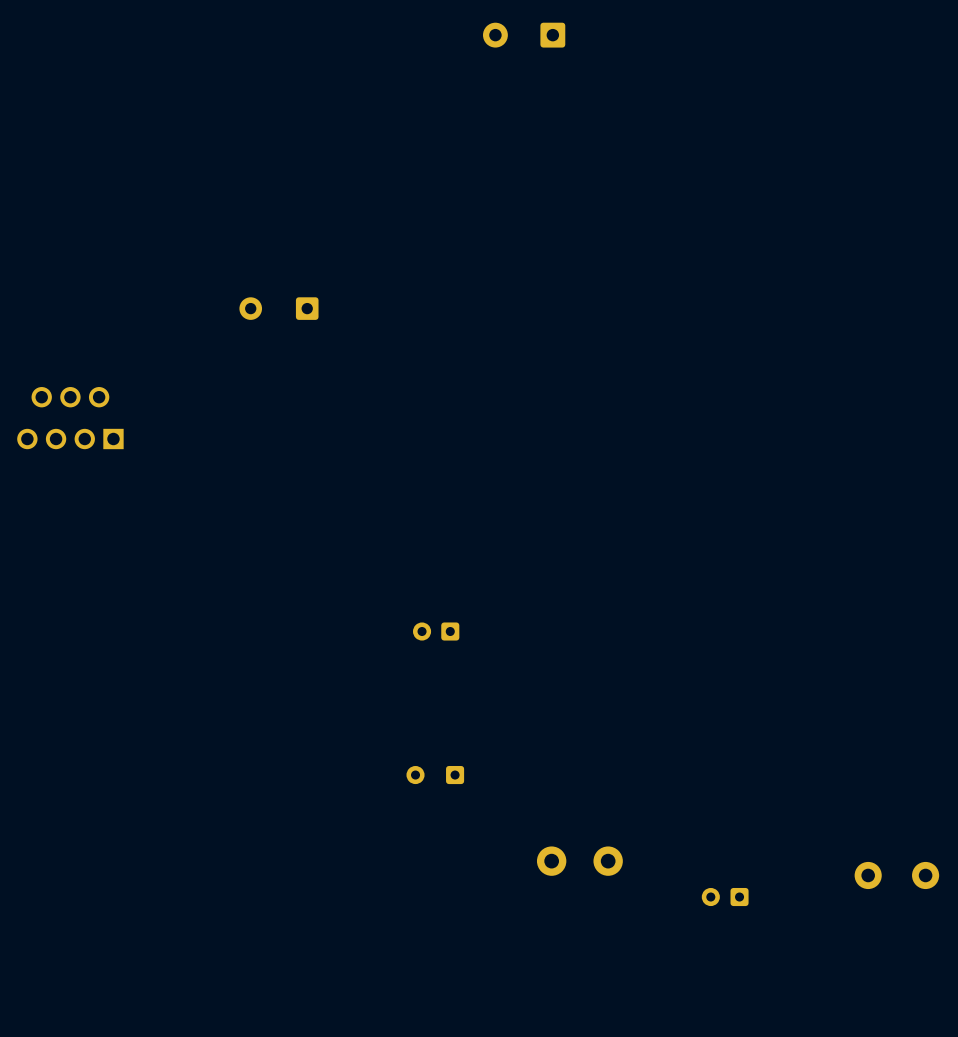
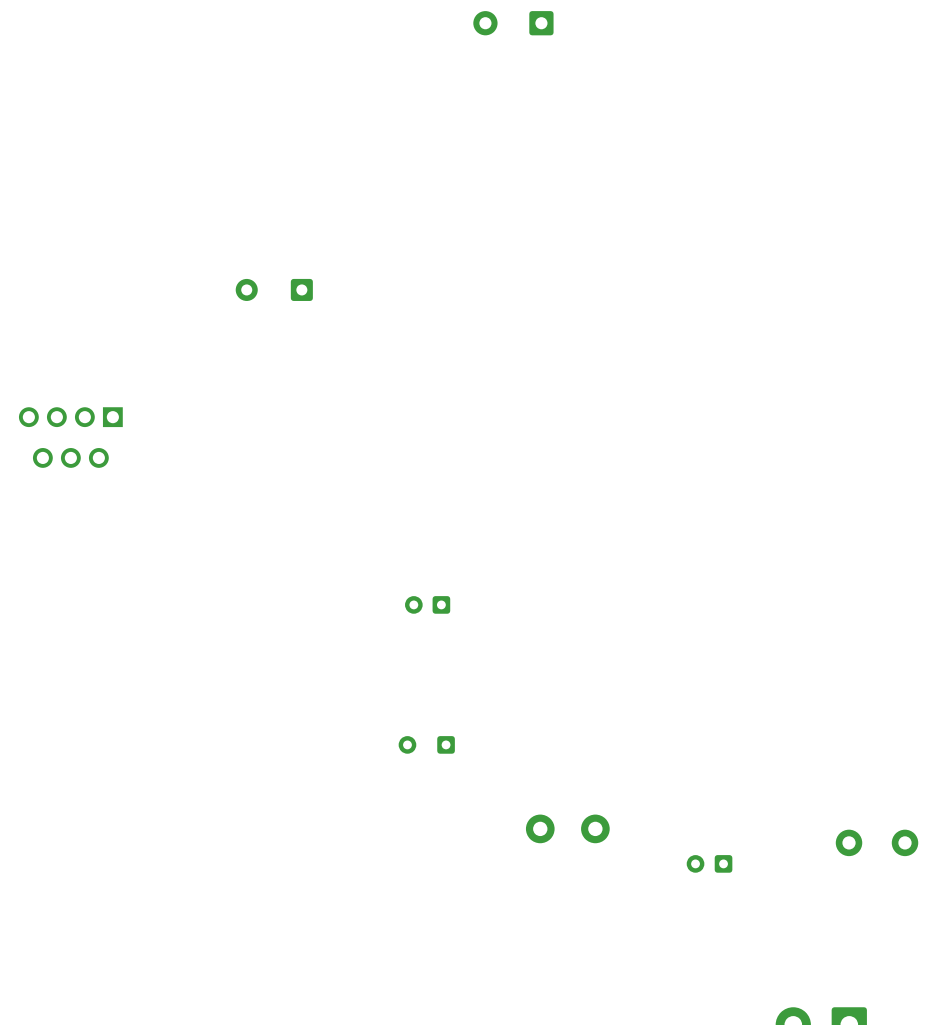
part: (70, 418) -> none
part: none -> (70, 437)

